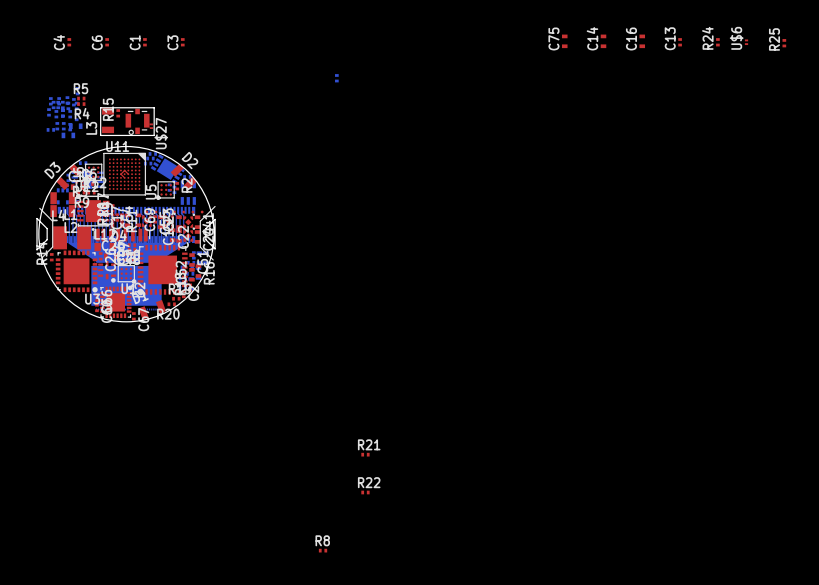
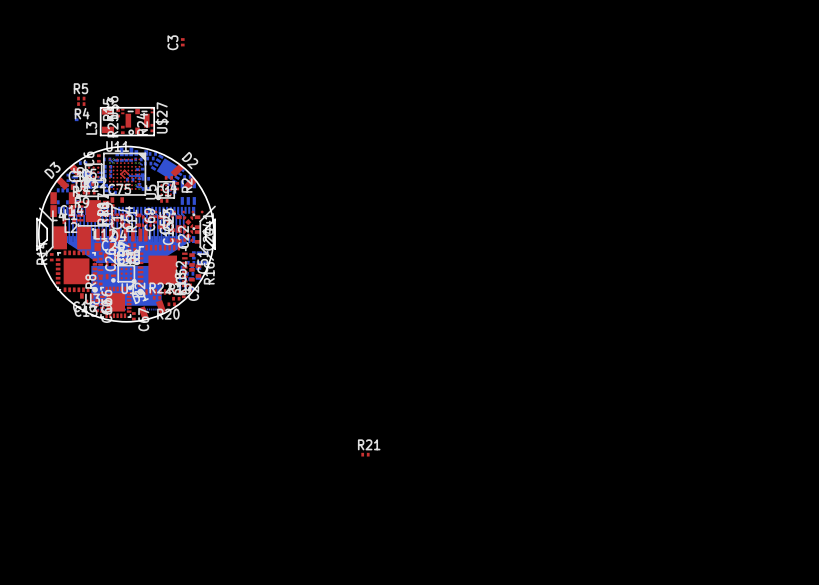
C75 rotation: 0° (564, 41) -> 90° clockwise (117, 200)
C75 position: (564, 41) -> (117, 200)
C14 rotation: 0° (603, 41) -> 90° clockwise (69, 221)
C14 position: (603, 41) -> (69, 221)
C16 rotation: 0° (642, 41) -> 90° clockwise (86, 295)
C16 position: (642, 41) -> (86, 295)
C4 rotation: 0° (69, 42) -> 90° clockwise (168, 177)
C4 position: (69, 42) -> (168, 177)
C6 position: (107, 42) -> (98, 158)
C1 rotation: 0° (144, 42) -> 90° clockwise (164, 200)
C1 position: (144, 42) -> (164, 200)
C13 rotation: 0° (680, 42) -> 90° clockwise (89, 301)
C13 position: (680, 42) -> (89, 301)
R24 position: (717, 42) -> (152, 128)
U$6 position: (746, 42) -> (122, 111)
R25 position: (784, 43) -> (122, 129)
part: (336, 78) -> none
part: (77, 91) -> none
part: (67, 100) -> none
part: (50, 101) -> none
part: (59, 101) -> none
part: (73, 102) -> none
part: (53, 105) -> none
part: (58, 105) -> none
part: (62, 105) -> none
part: (68, 105) -> none
part: (76, 105) -> none
part: (48, 112) -> none
part: (62, 113) -> none
part: (56, 114) -> none
part: (70, 114) -> none
part: (57, 126) -> none
part: (63, 126) -> none
part: (75, 126) -> none
U$27 position: (151, 126) -> (152, 110)
part: (70, 127) -> none
part: (50, 129) -> none
part: (68, 135) -> none
part: none -> (126, 150)
part: none -> (141, 152)
part: none -> (117, 157)
part: none -> (121, 157)
part: none -> (126, 157)
part: none -> (131, 157)
part: none -> (107, 159)
bottom track: none -> (109, 159) (113, 163)
bottom track: none -> (113, 159) (117, 160)
via: none -> (113, 159)
part: none -> (138, 159)
via: none -> (109, 163)
via: none -> (113, 163)
via: none -> (135, 163)
bottom track: none -> (139, 163) (142, 164)
via: none -> (139, 163)
part: none -> (108, 166)
part: none -> (108, 171)
part: none -> (142, 171)
part: none -> (137, 172)
bottom track: none -> (128, 174) (130, 176) (144, 176)
part: none -> (108, 176)
part: none -> (145, 178)
part: none -> (130, 179)
part: none -> (139, 181)
bottom track: none -> (106, 185) (108, 187) (113, 185)
bottom track: none -> (135, 185) (143, 188)
via: none -> (135, 185)
part: none -> (106, 188)
via: none -> (139, 188)
part: none -> (145, 188)
part: none -> (112, 192)
R22 position: (365, 492) -> (156, 297)
R8 rotation: 0° (323, 550) -> 90° clockwise (100, 281)
R8 position: (323, 550) -> (100, 281)

